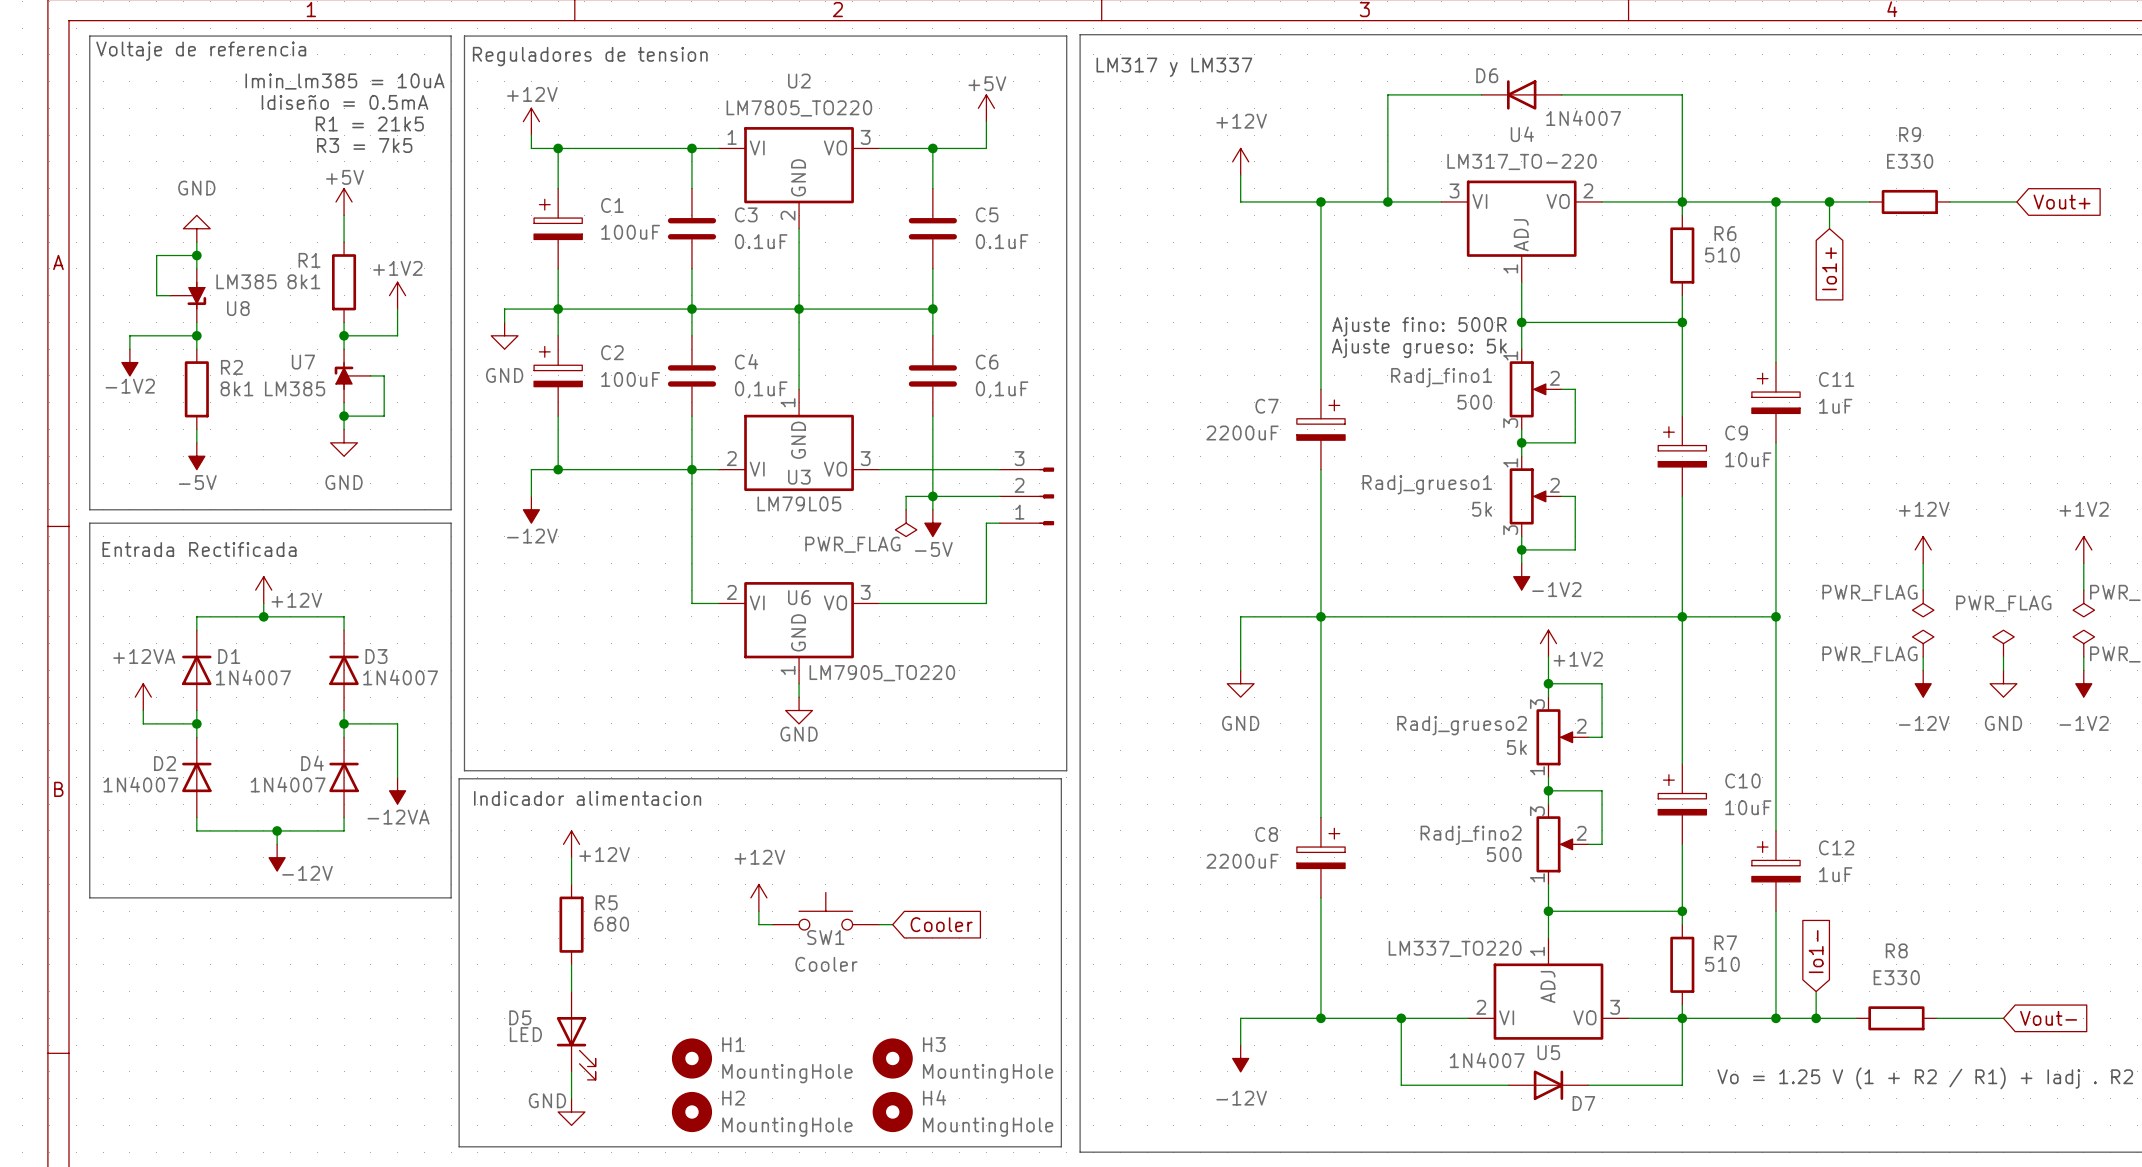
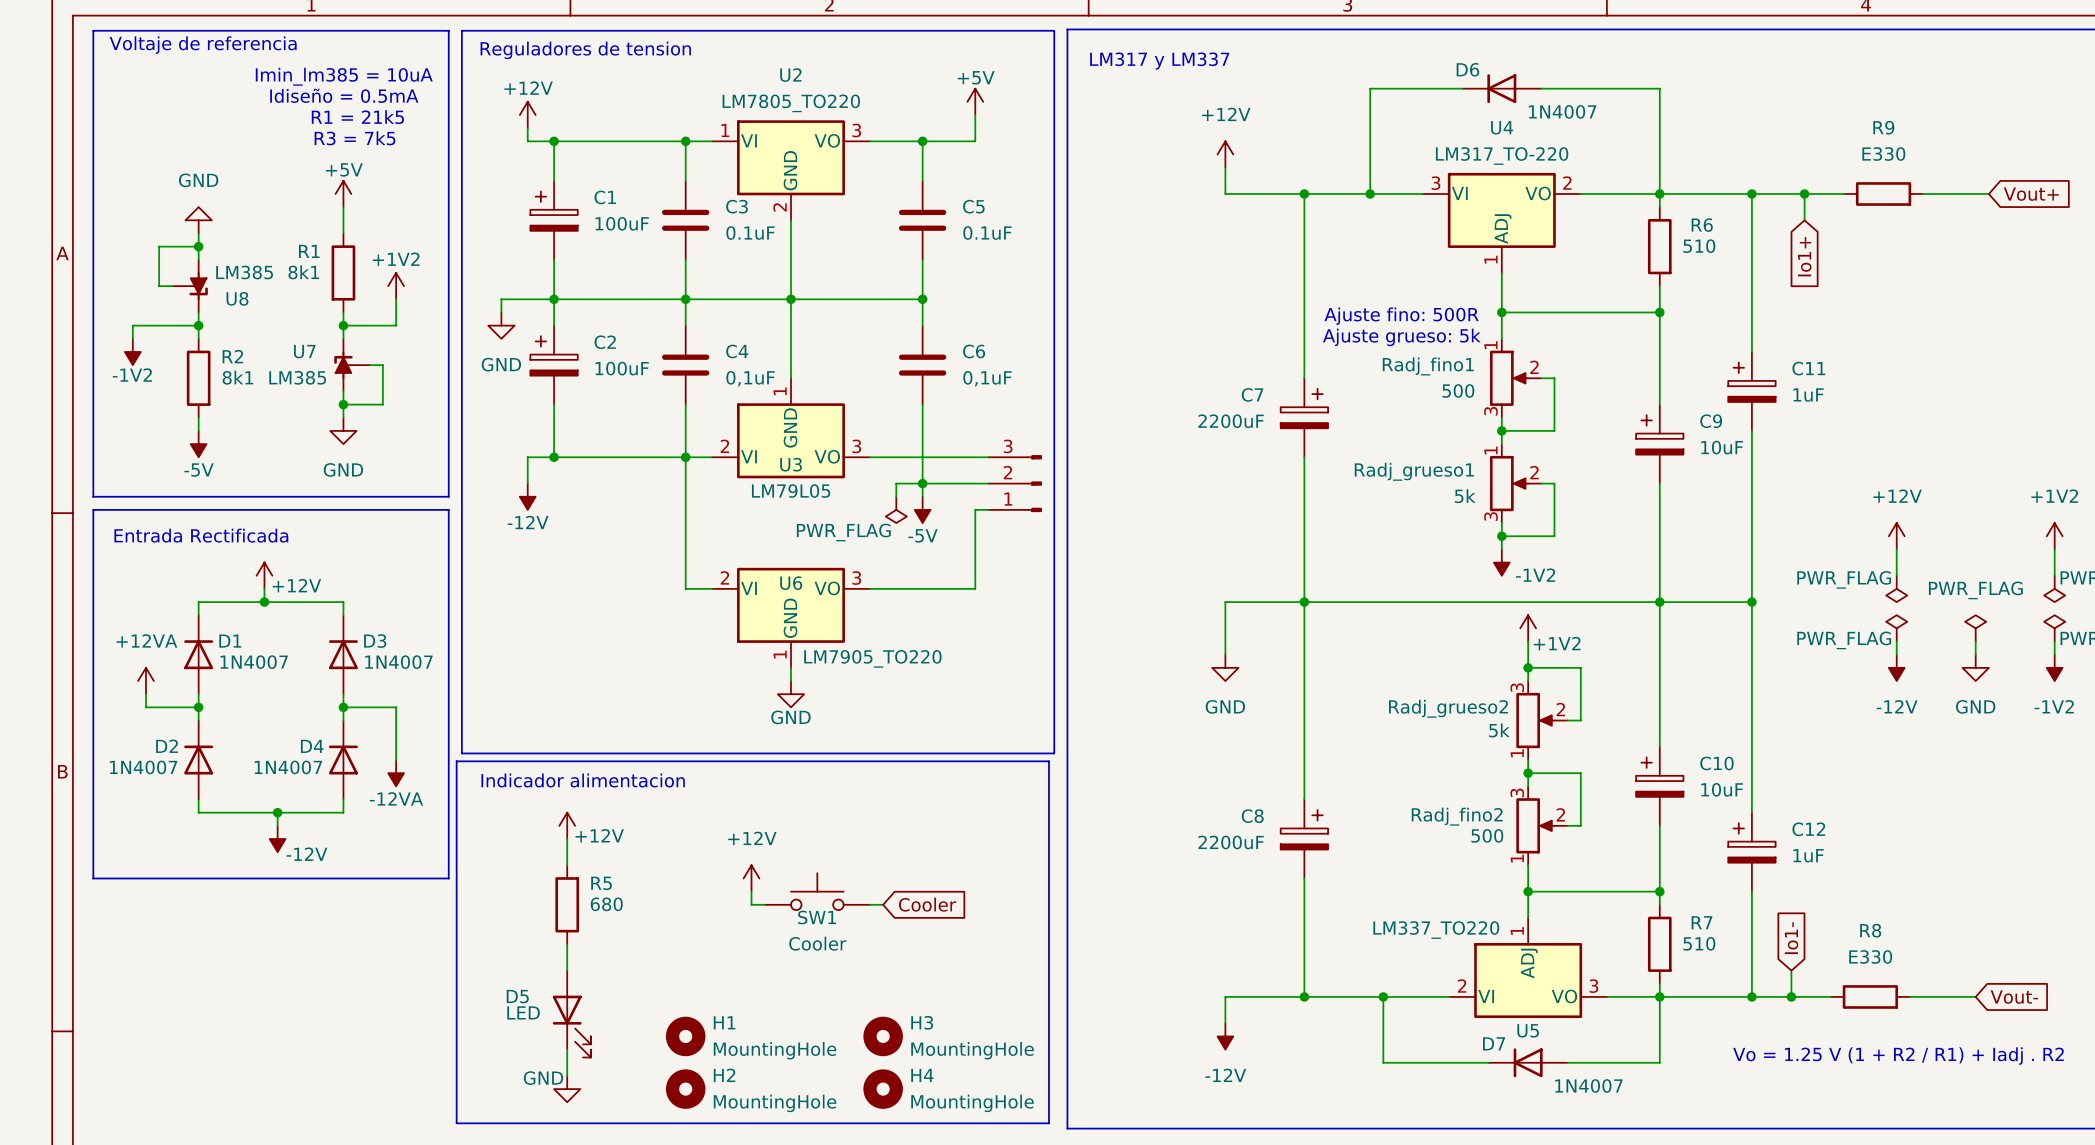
D7 rotation: 0° (1548, 1085) -> 180° (1528, 1062)

